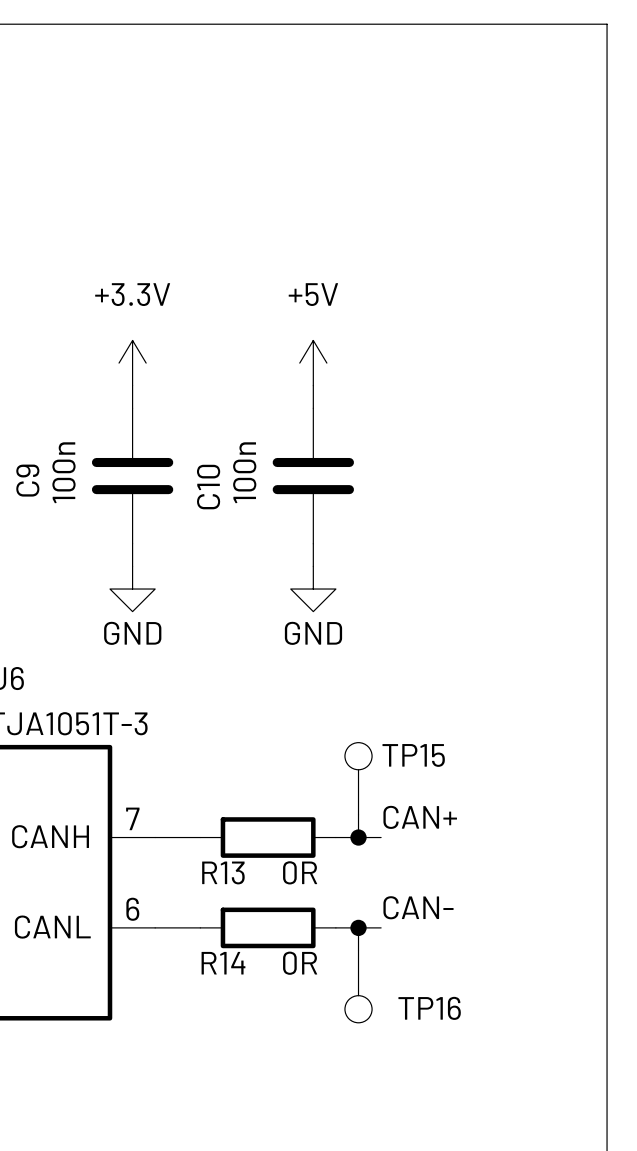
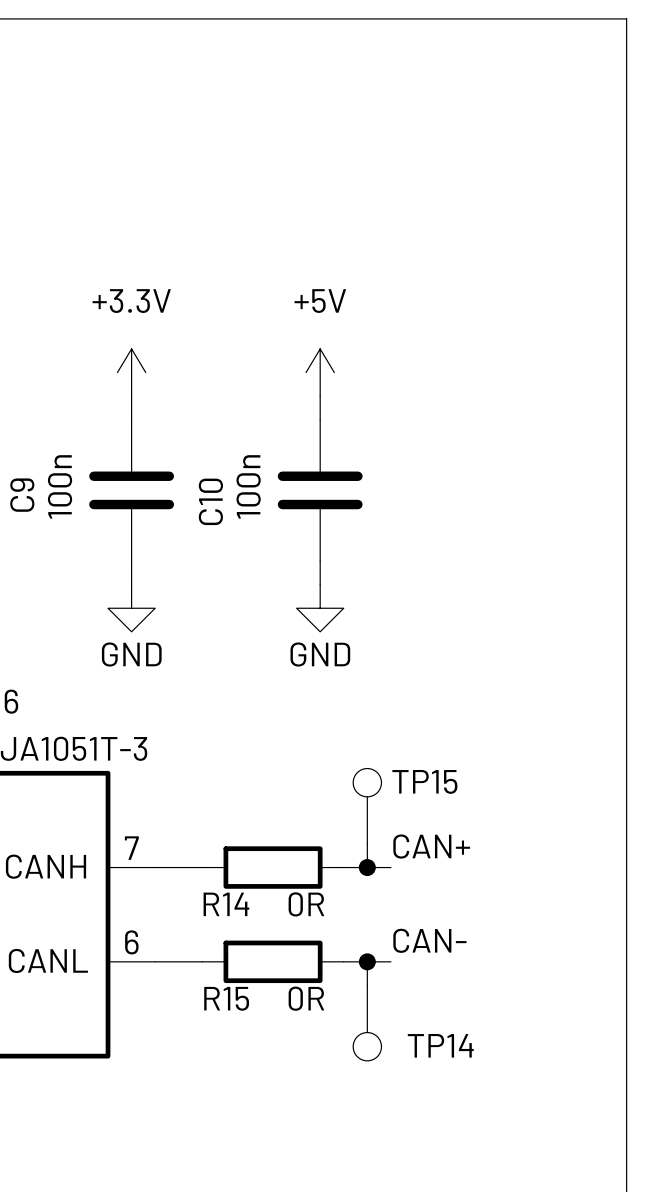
R13 name: R13 (223, 872) -> R14 (226, 904)
R14 name: R14 (223, 963) -> R15 (226, 998)
TP16 name: TP16 (429, 1008) -> TP14 (440, 1045)

